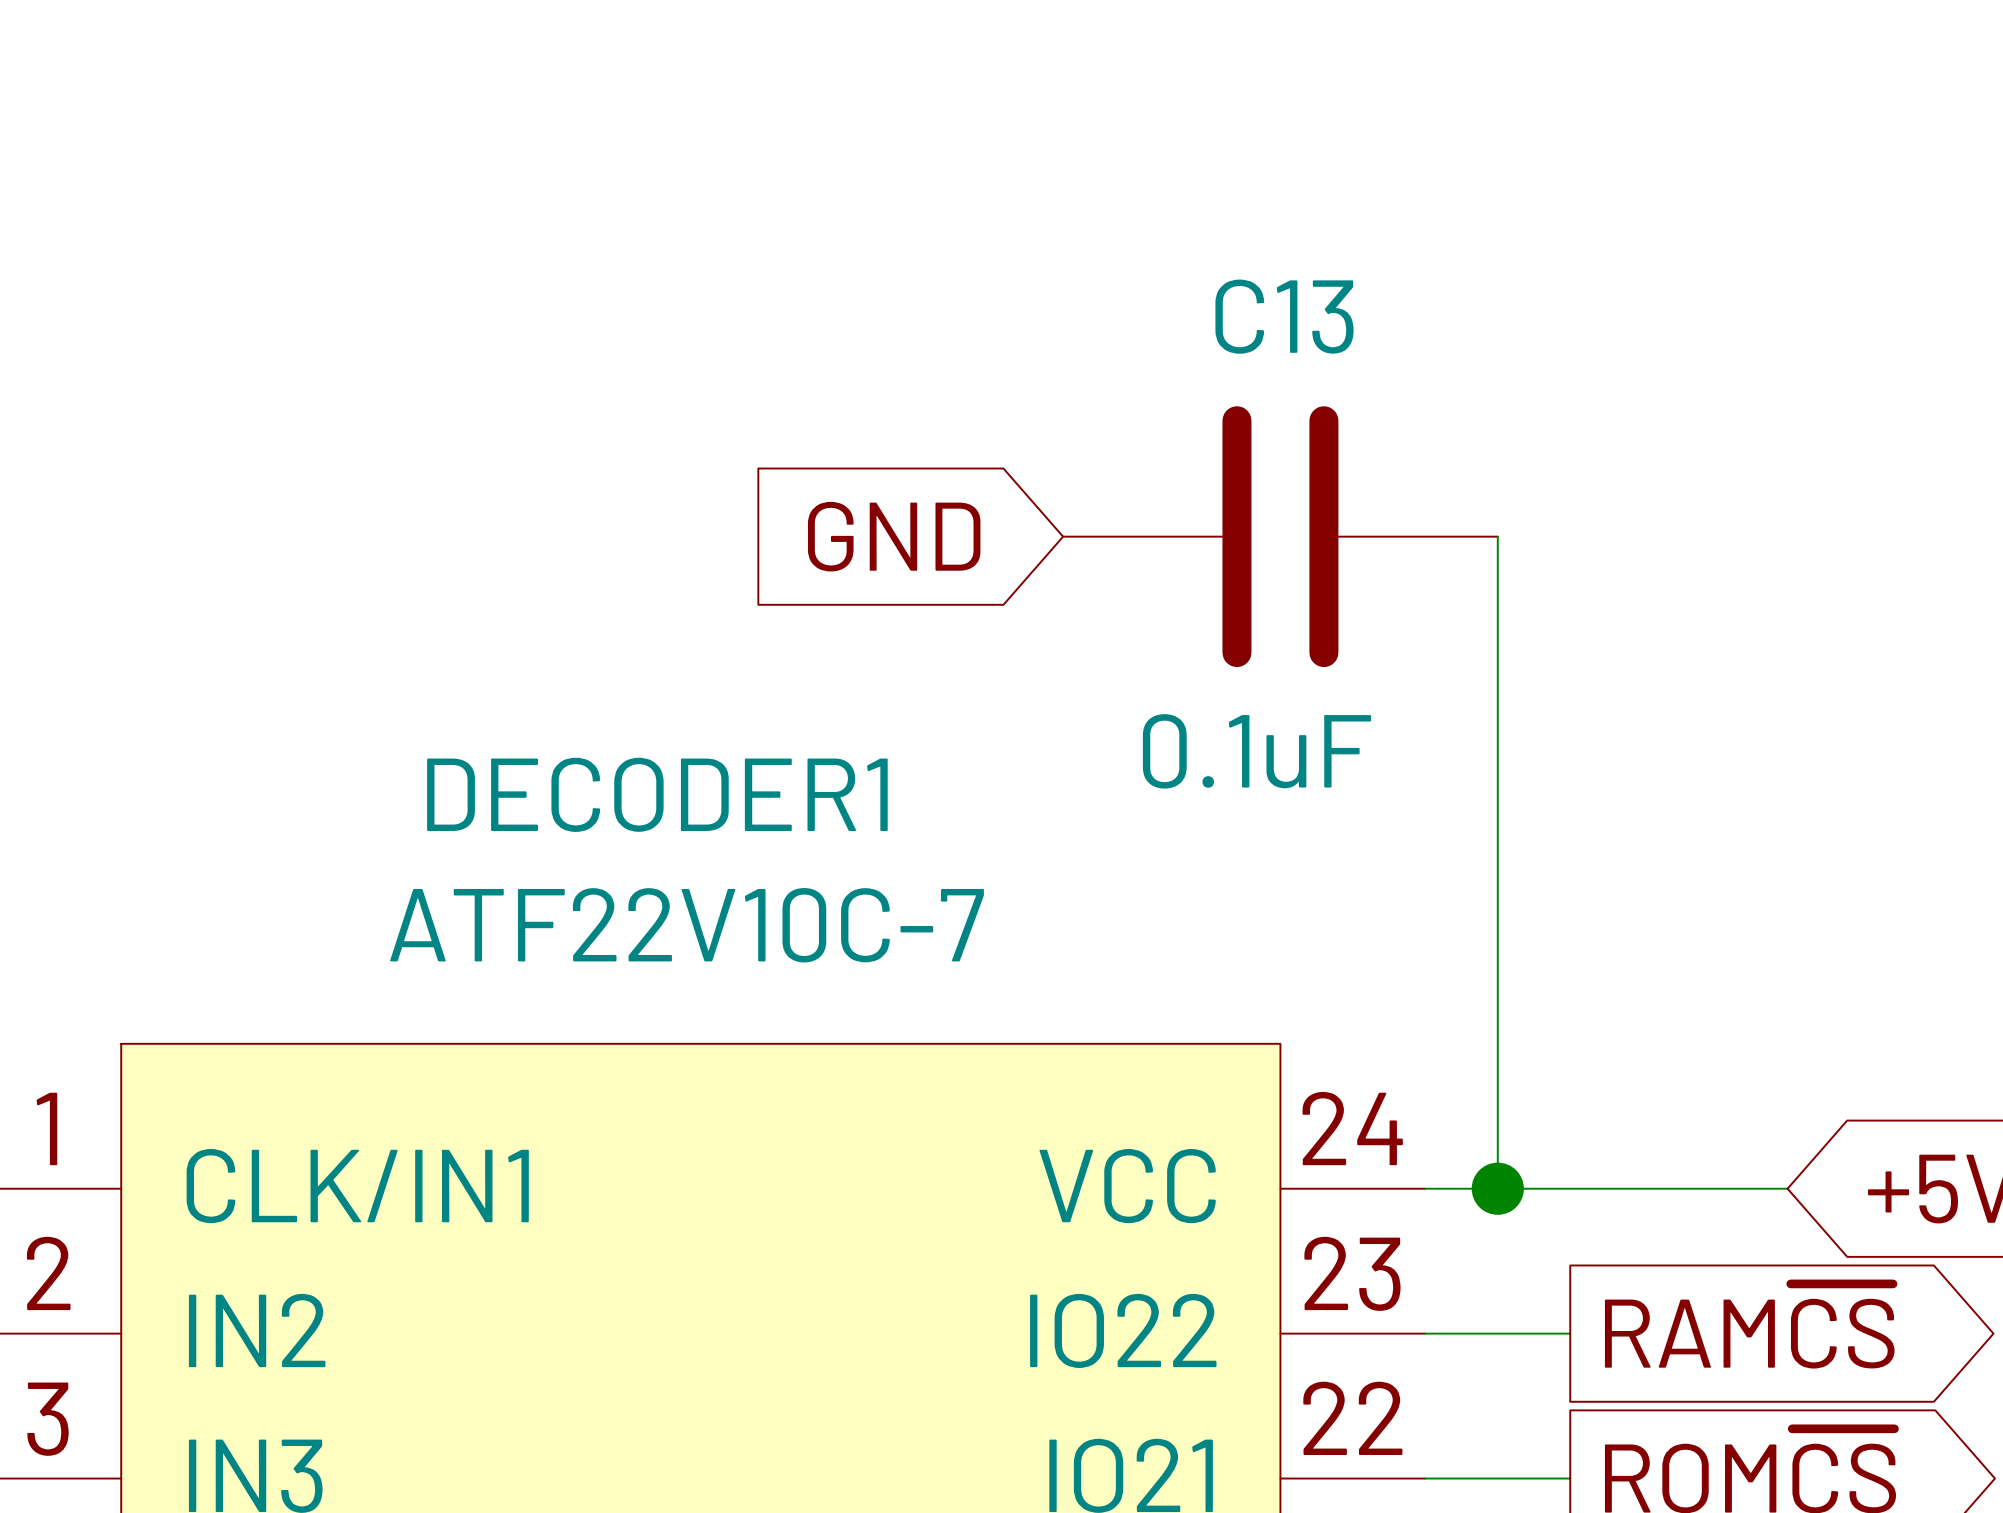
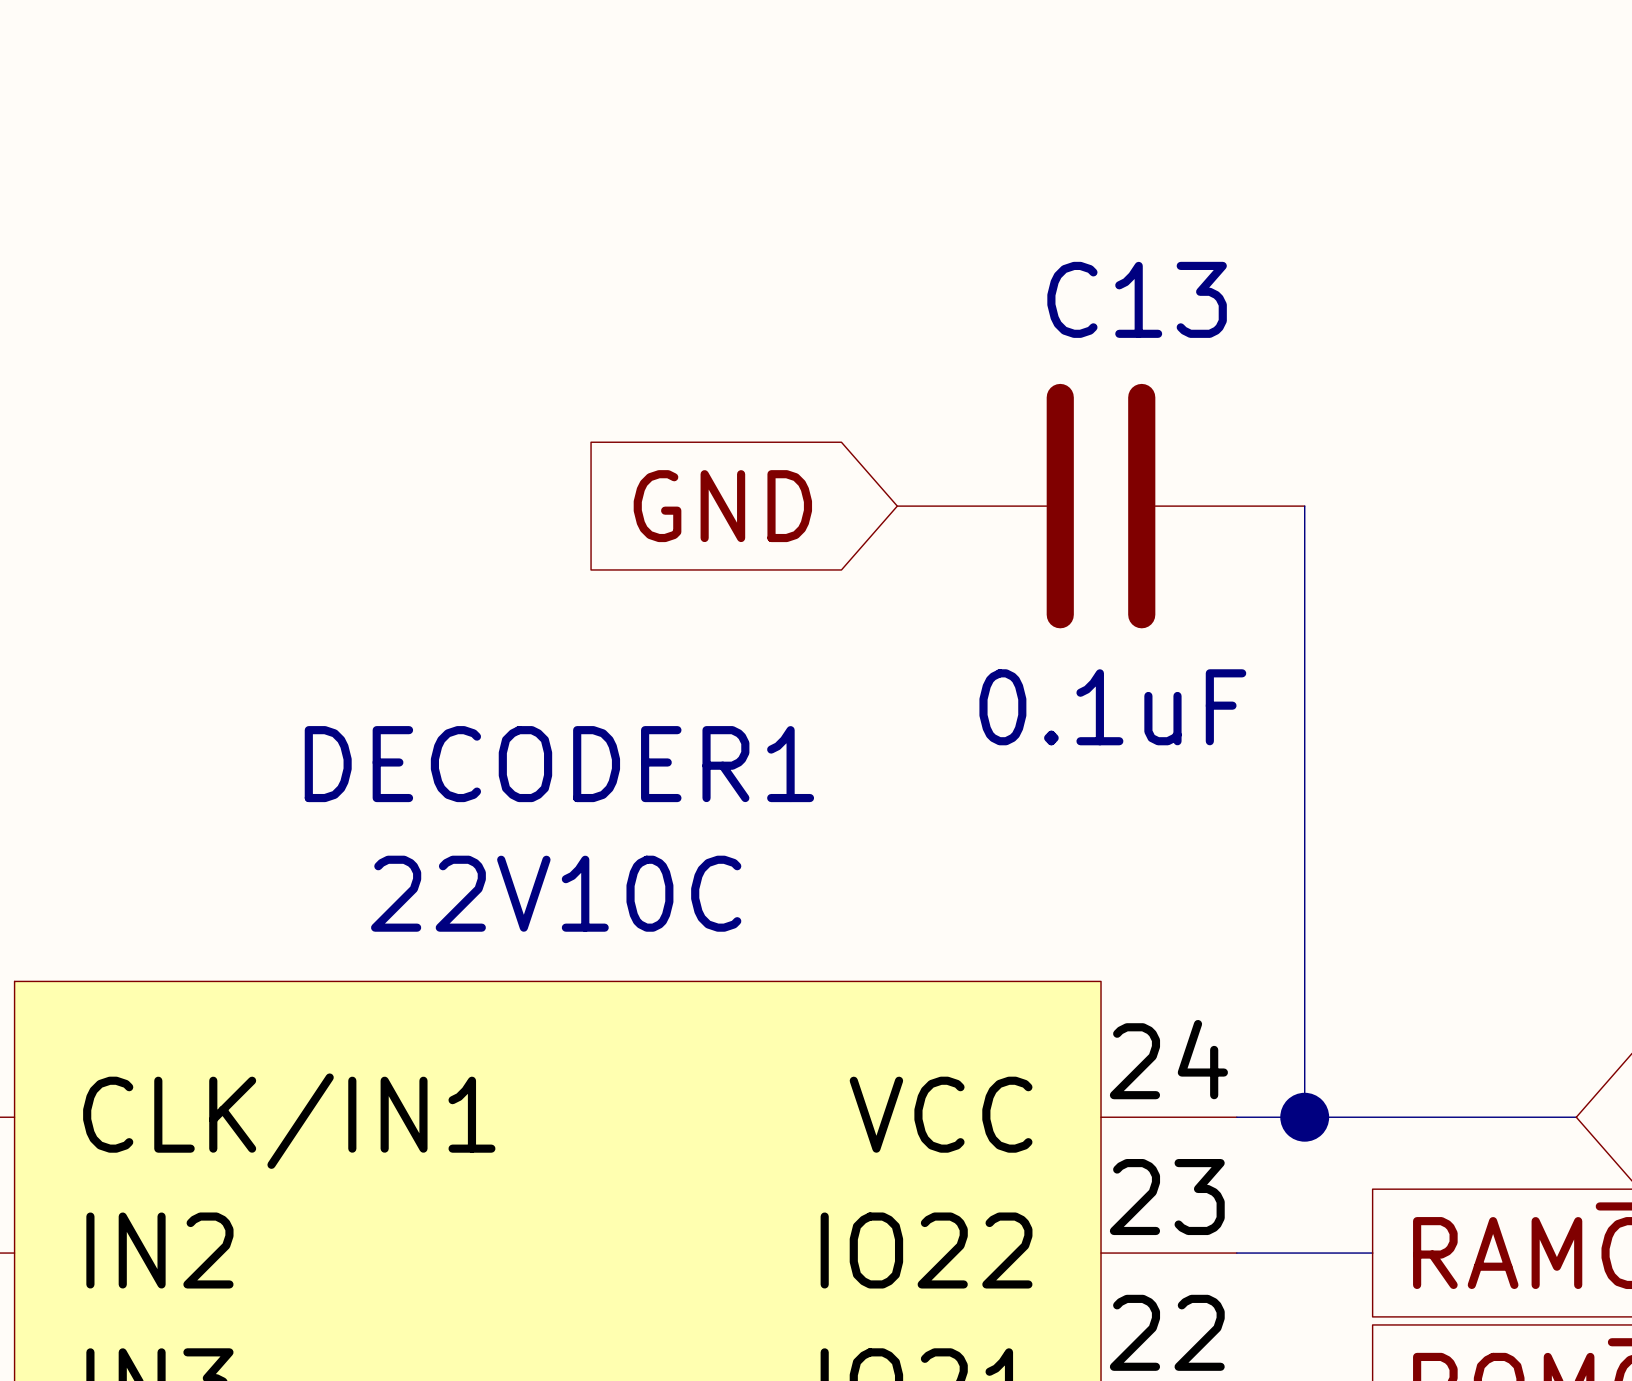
DECODER1 name position: DECODER1 (657, 794) -> DECODER1 (559, 764)
DECODER1 value: ATF22V10C-7 (686, 925) -> 22V10C (556, 893)

